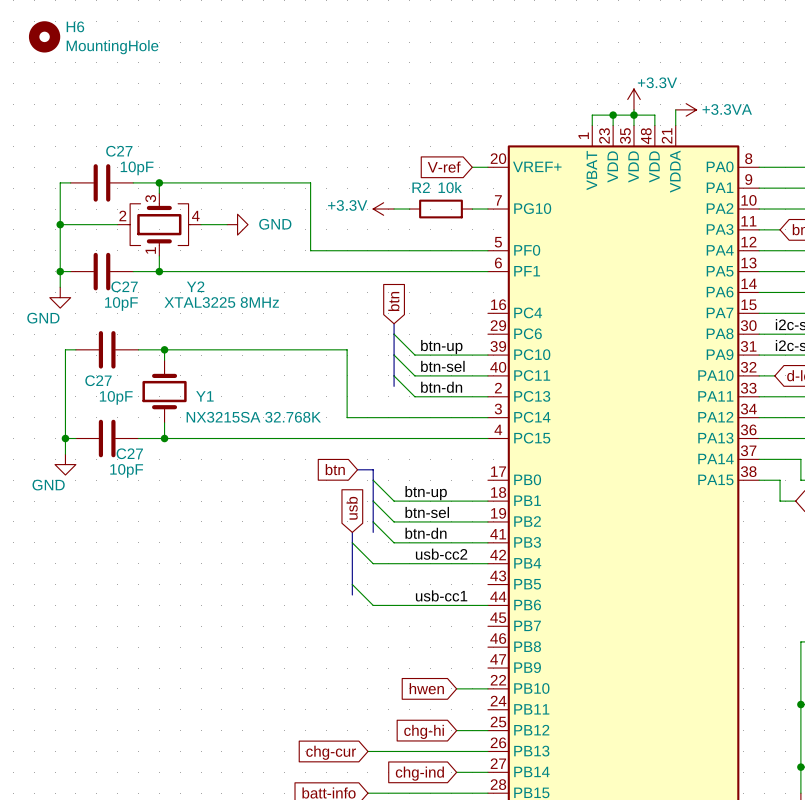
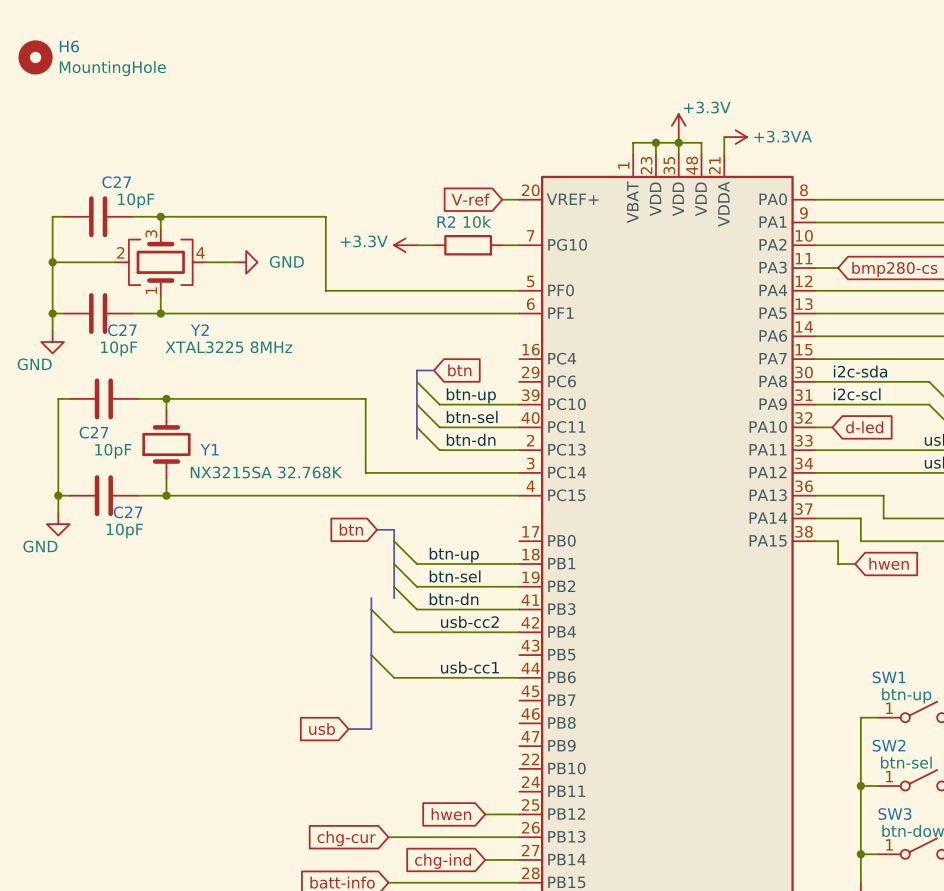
global label rotation: 0° (393, 301) -> 90° clockwise (459, 370)
bus: none -> (416, 370) (433, 370)
global label rotation: 0° (352, 508) -> 90° counterclockwise (322, 728)
global label position: usb (352, 508) -> usb (322, 728)
bus: none -> (371, 666) (371, 729) (348, 729)
global label: hwen (426, 688) -> none
wire: (456, 688) (487, 688) -> none
global label: chg-hi (424, 731) -> hwen (451, 814)

